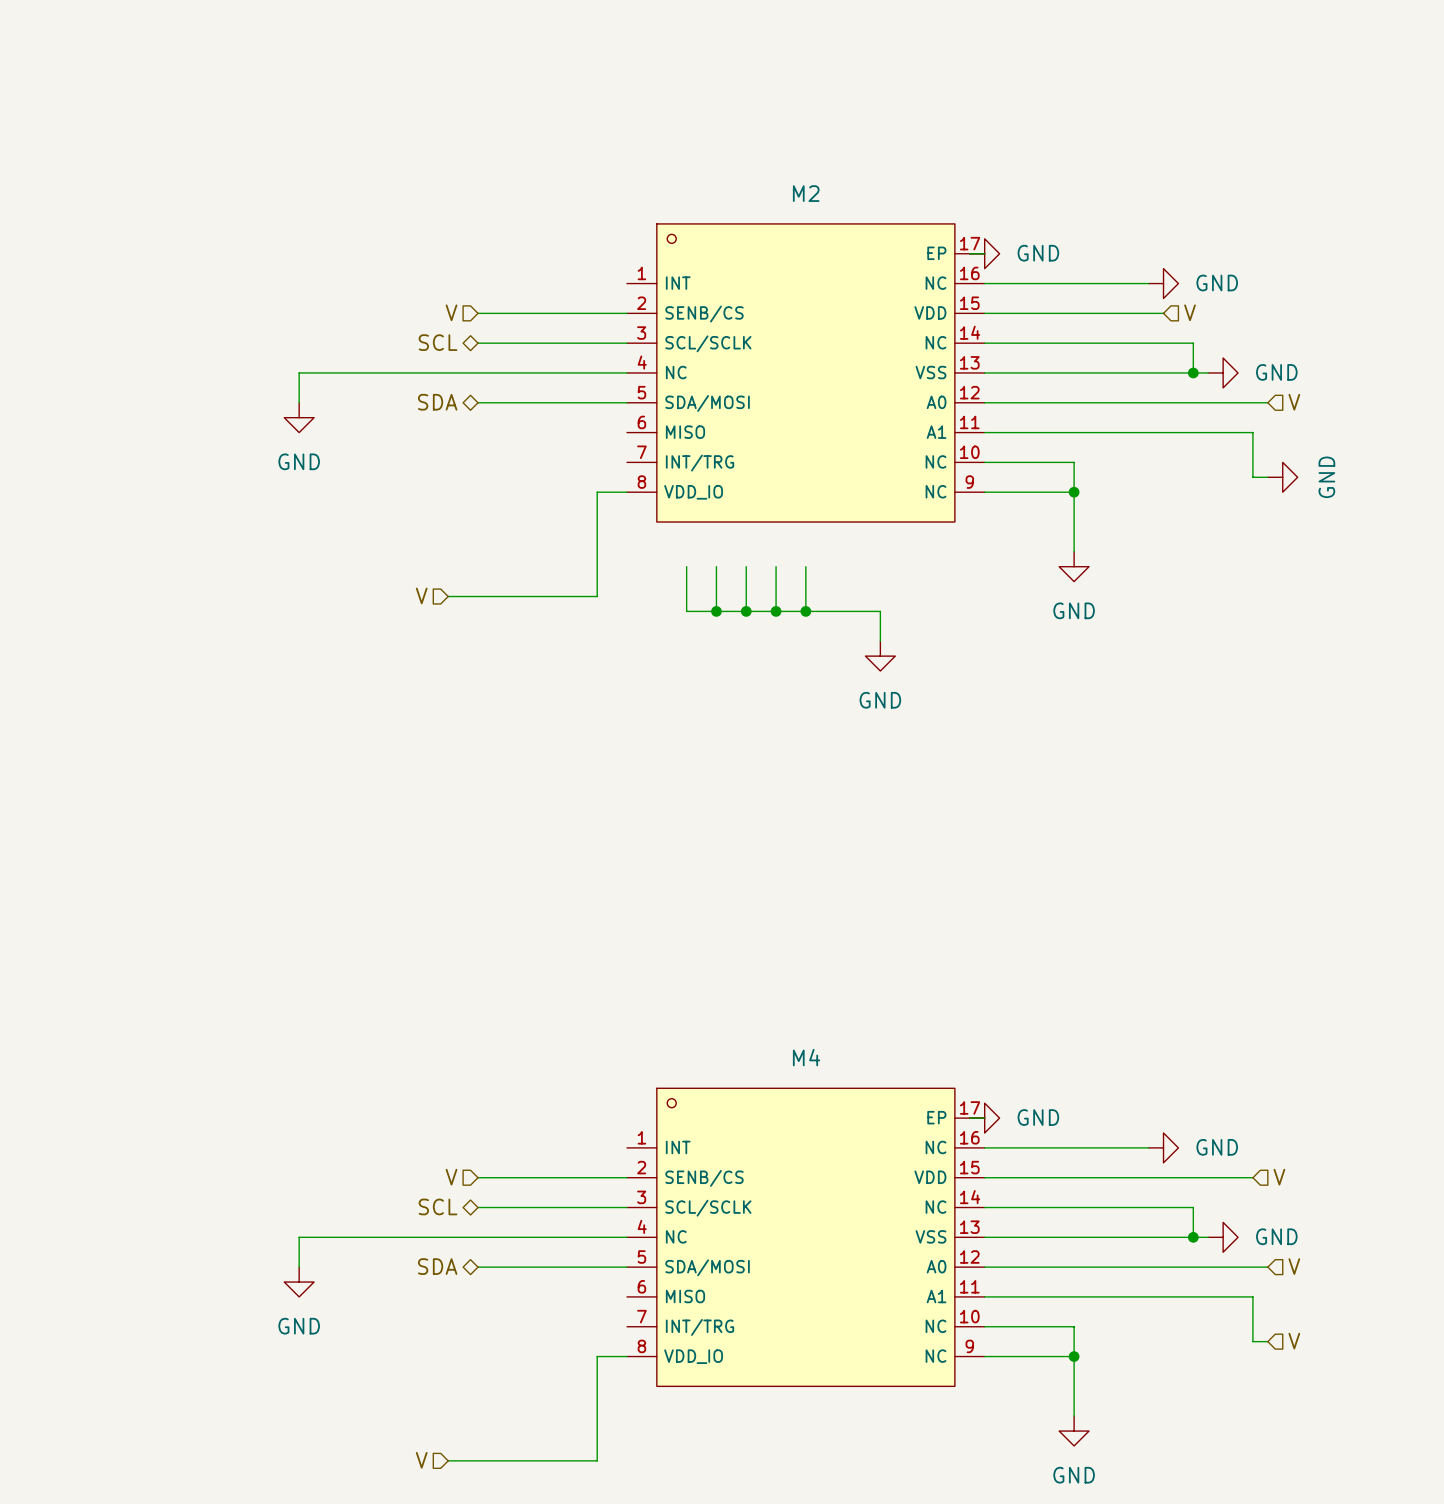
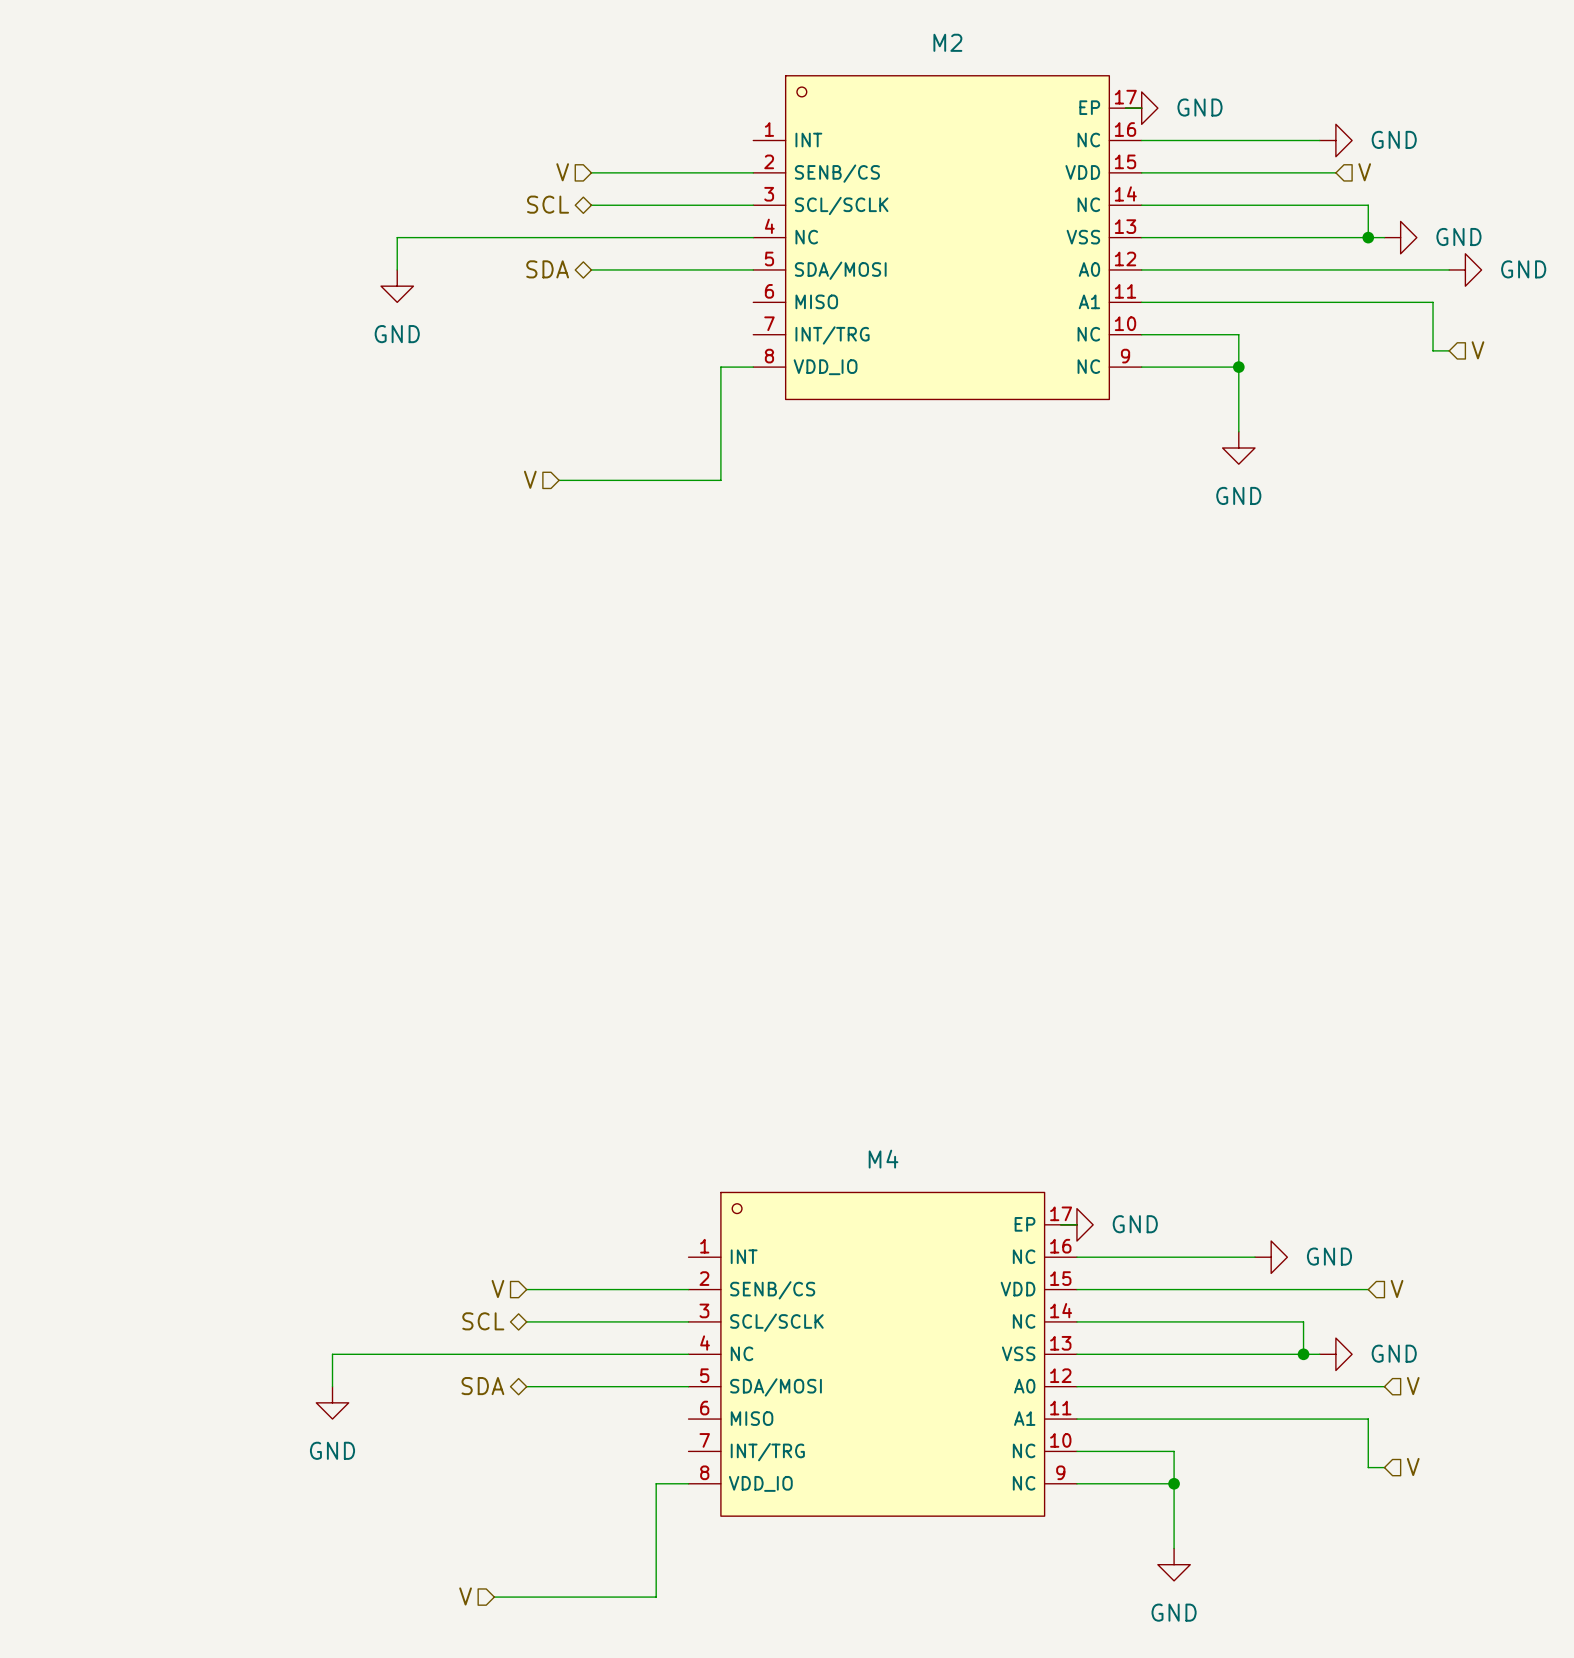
power symbol: none -> GND (1141, 108)
power symbol: none -> GND (1335, 140)
hierarchical label: none -> V (562, 172)
hierarchical label: none -> V (1364, 172)
junction: none -> (1368, 237)
power symbol: none -> GND (1400, 237)
power symbol: none -> GND (1465, 269)
power symbol: GND (984, 253) -> none
wire: (984, 283) (1148, 283) -> (1141, 140) (1319, 140)
power symbol: GND (1163, 283) -> none
hierarchical label: V (451, 312) -> none
hierarchical label: V (1190, 312) -> none
hierarchical label: none -> V (1477, 350)
wire: (478, 313) (627, 313) -> (591, 172) (753, 172)
wire: (984, 313) (1163, 313) -> (1141, 172) (1335, 172)
junction: none -> (1238, 367)
hierarchical label position: SCL (438, 342) -> SCL (548, 204)
wire: (478, 343) (627, 343) -> (591, 205) (753, 205)
wire: (984, 343) (1193, 343) (1193, 372) -> (1141, 205) (1368, 205) (1368, 237)
wire: (627, 372) (299, 372) (299, 402) -> (753, 237) (397, 237) (397, 269)
M2 position: (805, 372) -> (947, 237)
wire: (984, 372) (1208, 372) -> (1141, 237) (1384, 237)
junction: (1193, 372) -> none
power symbol: GND (1223, 372) -> none
hierarchical label position: SDA (437, 402) -> SDA (547, 269)
wire: (478, 402) (627, 402) -> (591, 269) (753, 269)
wire: (984, 402) (1267, 402) -> (1141, 269) (1449, 269)
power symbol: none -> GND (1238, 448)
hierarchical label: V (1294, 402) -> none
power symbol position: GND (299, 417) -> GND (397, 286)
hierarchical label: none -> V (530, 479)
wire: (984, 432) (1252, 432) (1252, 477) (1267, 477) -> (1141, 302) (1433, 302) (1433, 350) (1449, 350)
wire: (984, 462) (1074, 462) (1074, 551) -> (1141, 334) (1238, 334) (1238, 431)
power symbol: GND (1282, 477) -> none
wire: (627, 492) (597, 492) (597, 596) (448, 596) -> (753, 367) (720, 367) (720, 480) (559, 480)
wire: (984, 492) (1074, 492) -> (1141, 367) (1238, 367)
junction: (1074, 492) -> none
wire: (686, 566) (686, 611) (880, 611) (880, 641) -> none
wire: (716, 566) (716, 611) -> none
wire: (746, 566) (746, 611) -> none
wire: (776, 566) (776, 611) -> none
wire: (805, 566) (805, 611) -> none
power symbol: GND (1074, 566) -> none
hierarchical label: V (421, 595) -> none
junction: (716, 611) -> none
junction: (746, 611) -> none
junction: (776, 611) -> none
junction: (805, 611) -> none
power symbol: GND (880, 656) -> none

